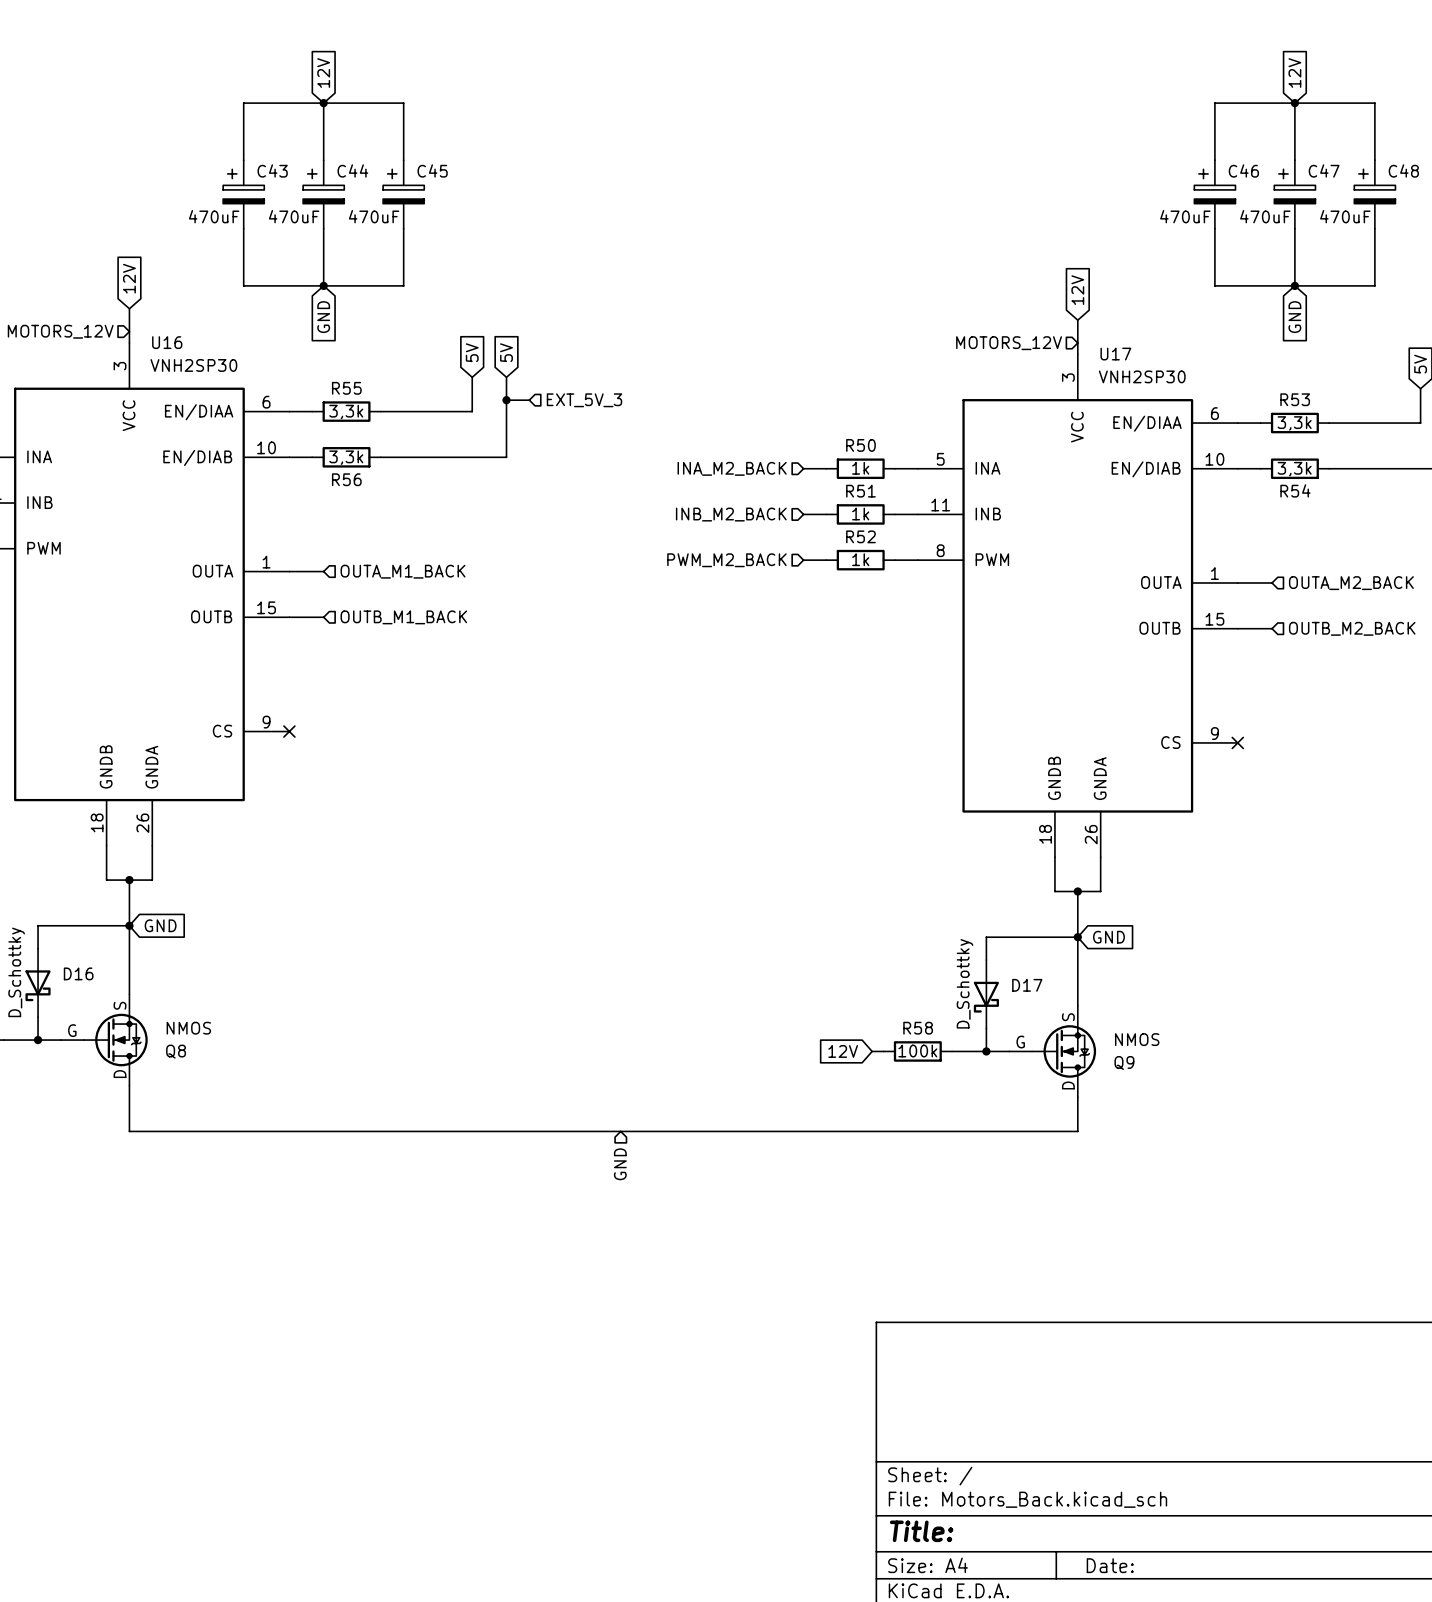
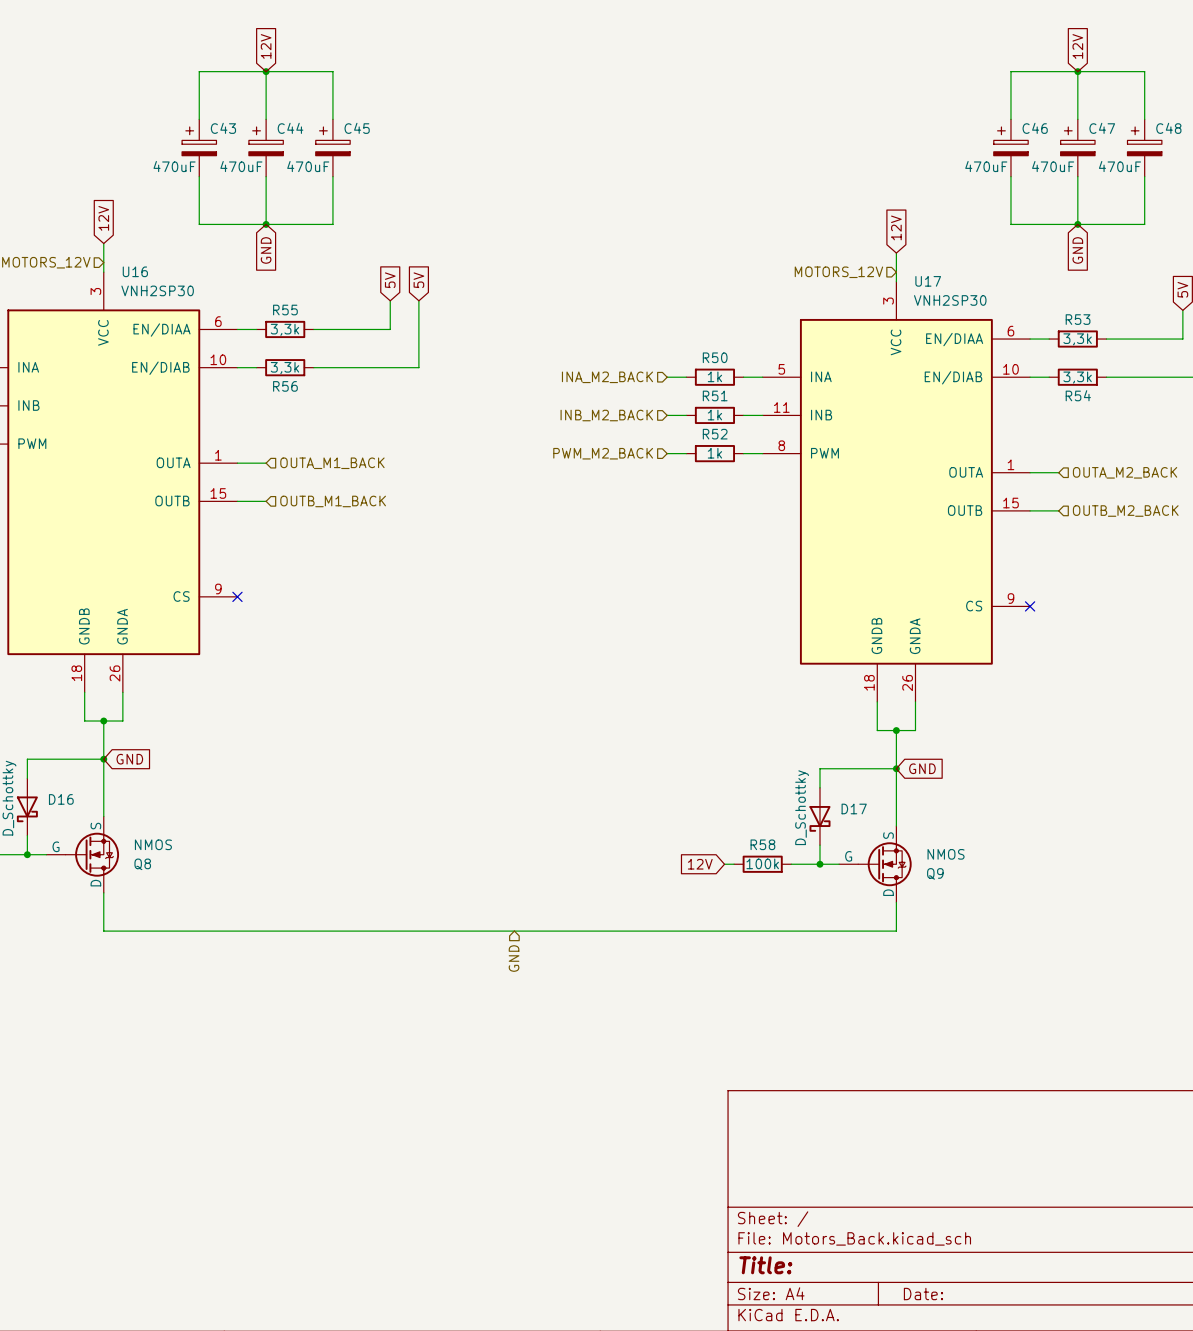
wire: (506, 400) (529, 400) -> none
junction: (506, 400) -> none
hierarchical label: EXT_5V_3 (584, 400) -> none

